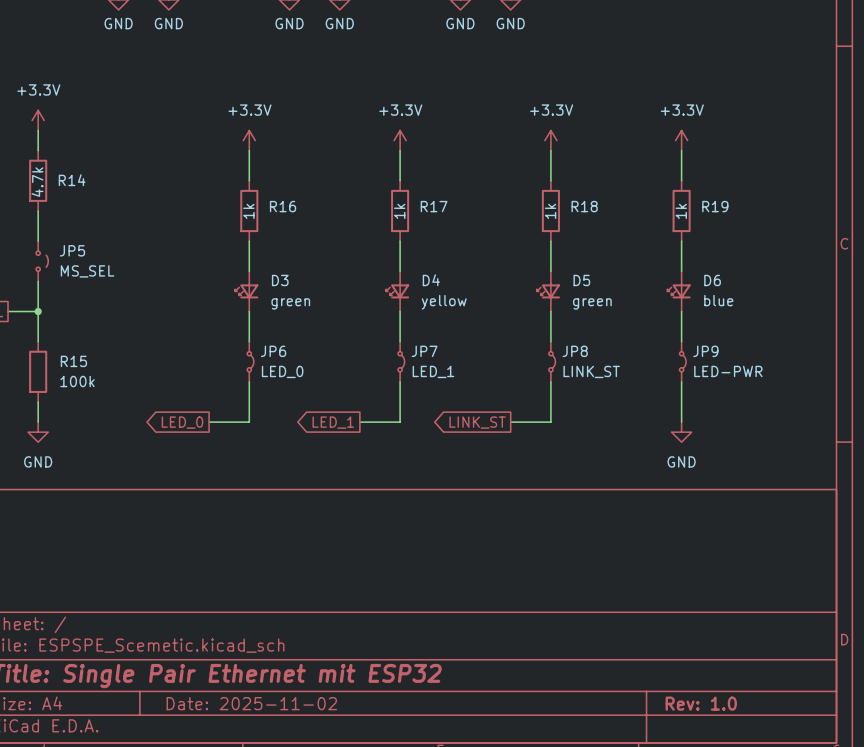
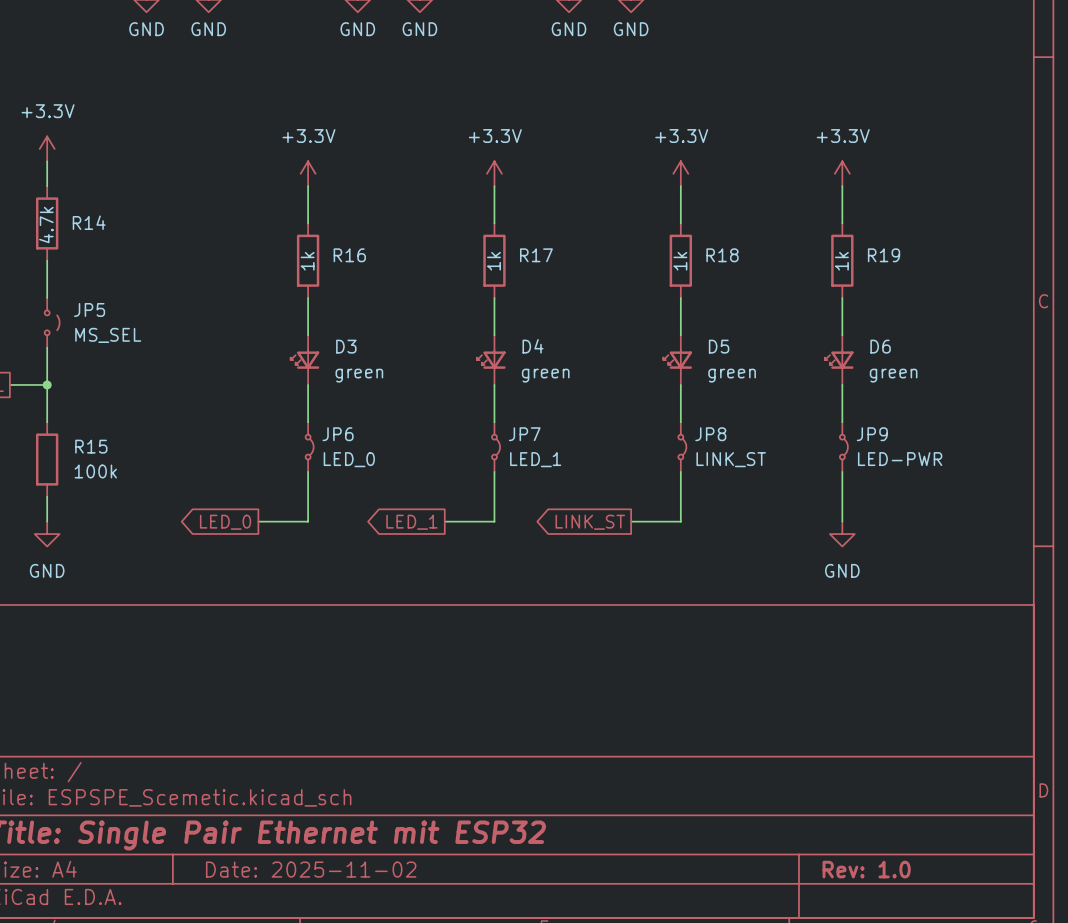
D6 value: blue (718, 300) -> green (893, 375)
D4 value: yellow (444, 302) -> green (545, 375)

